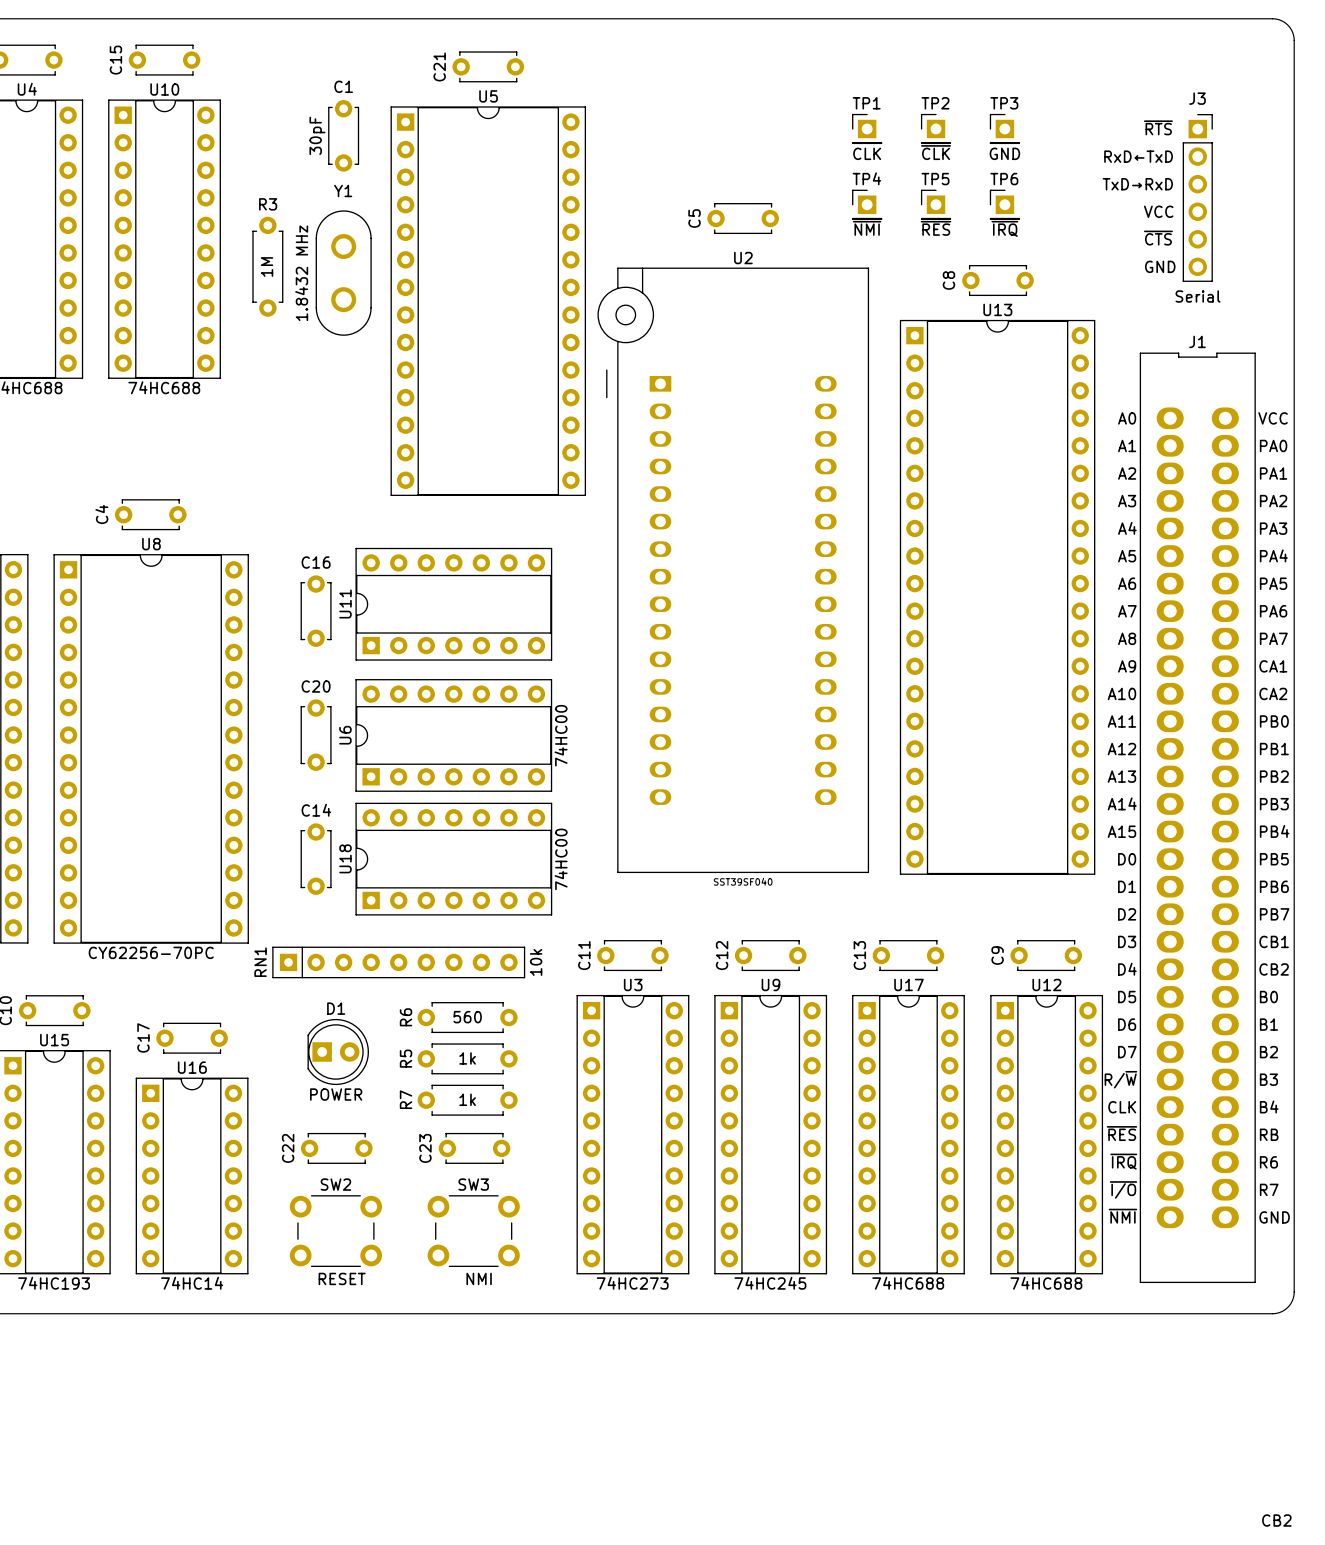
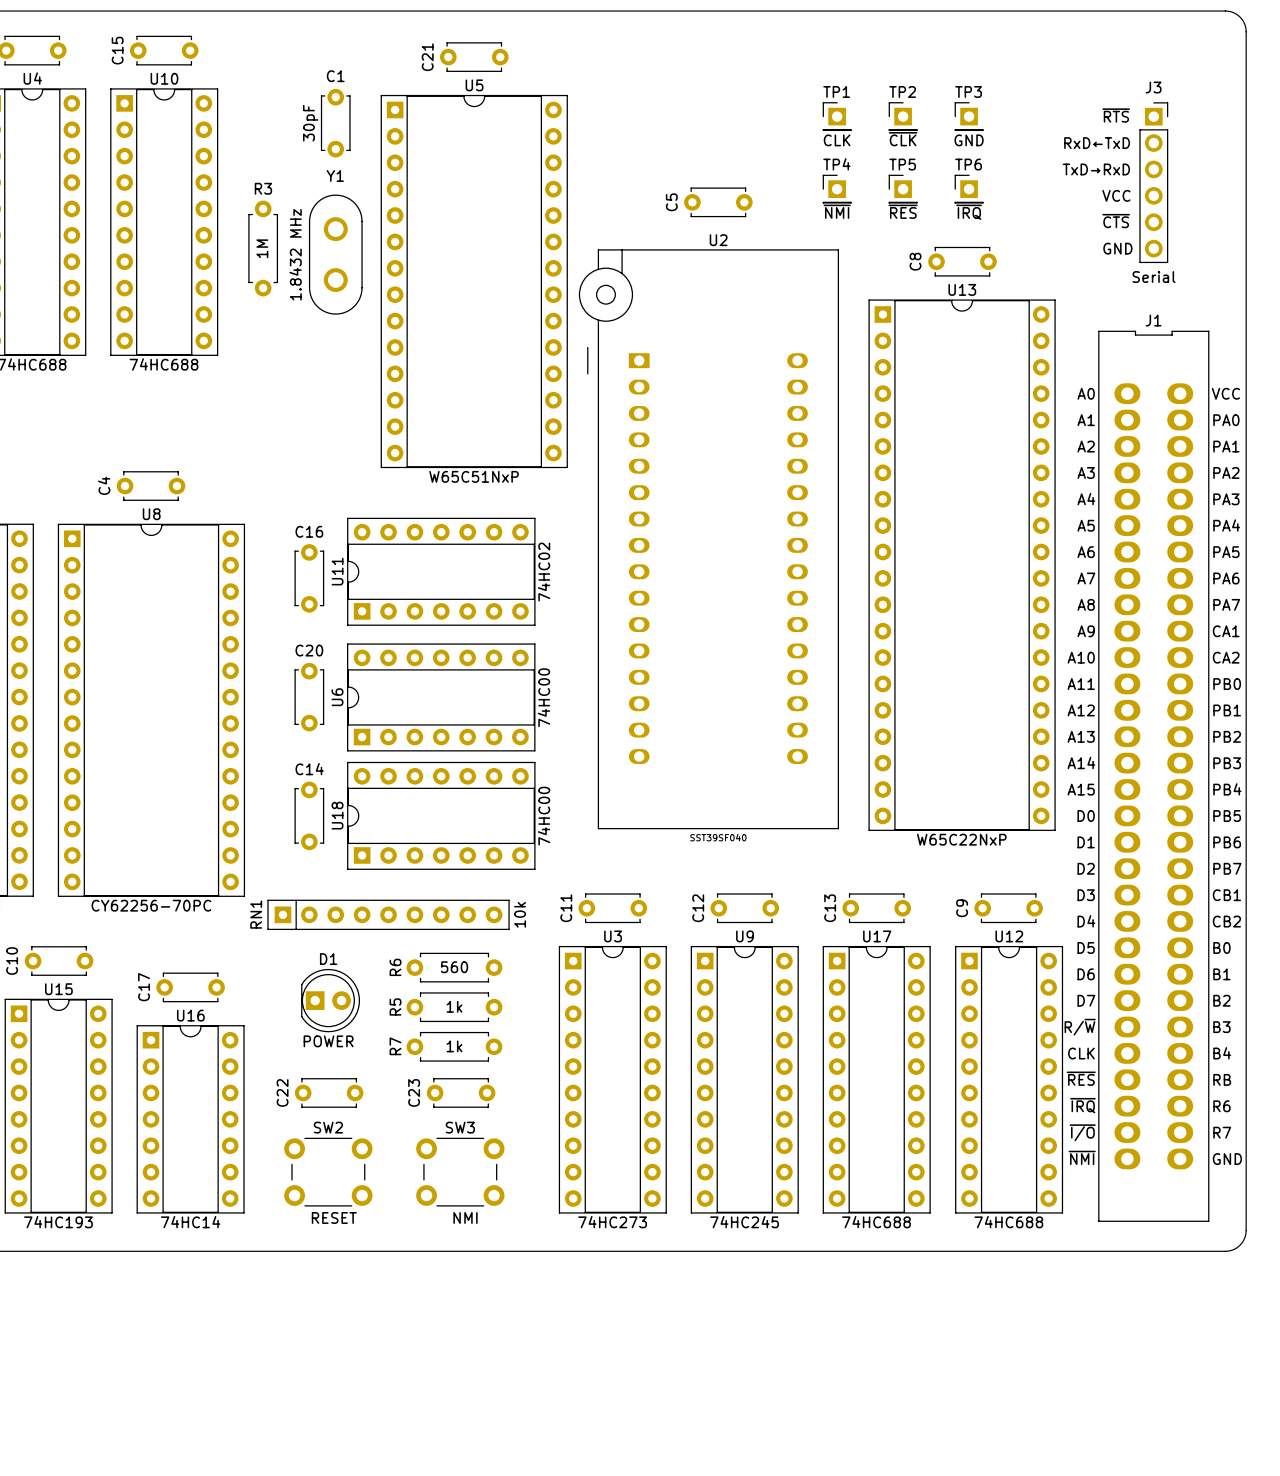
U5 value: none -> W65C51NxP (474, 476)
U11 value: none -> 74HC02 (544, 572)
U13 value: none -> W65C22NxP (961, 839)
text: CB2 (1276, 1520) -> none

